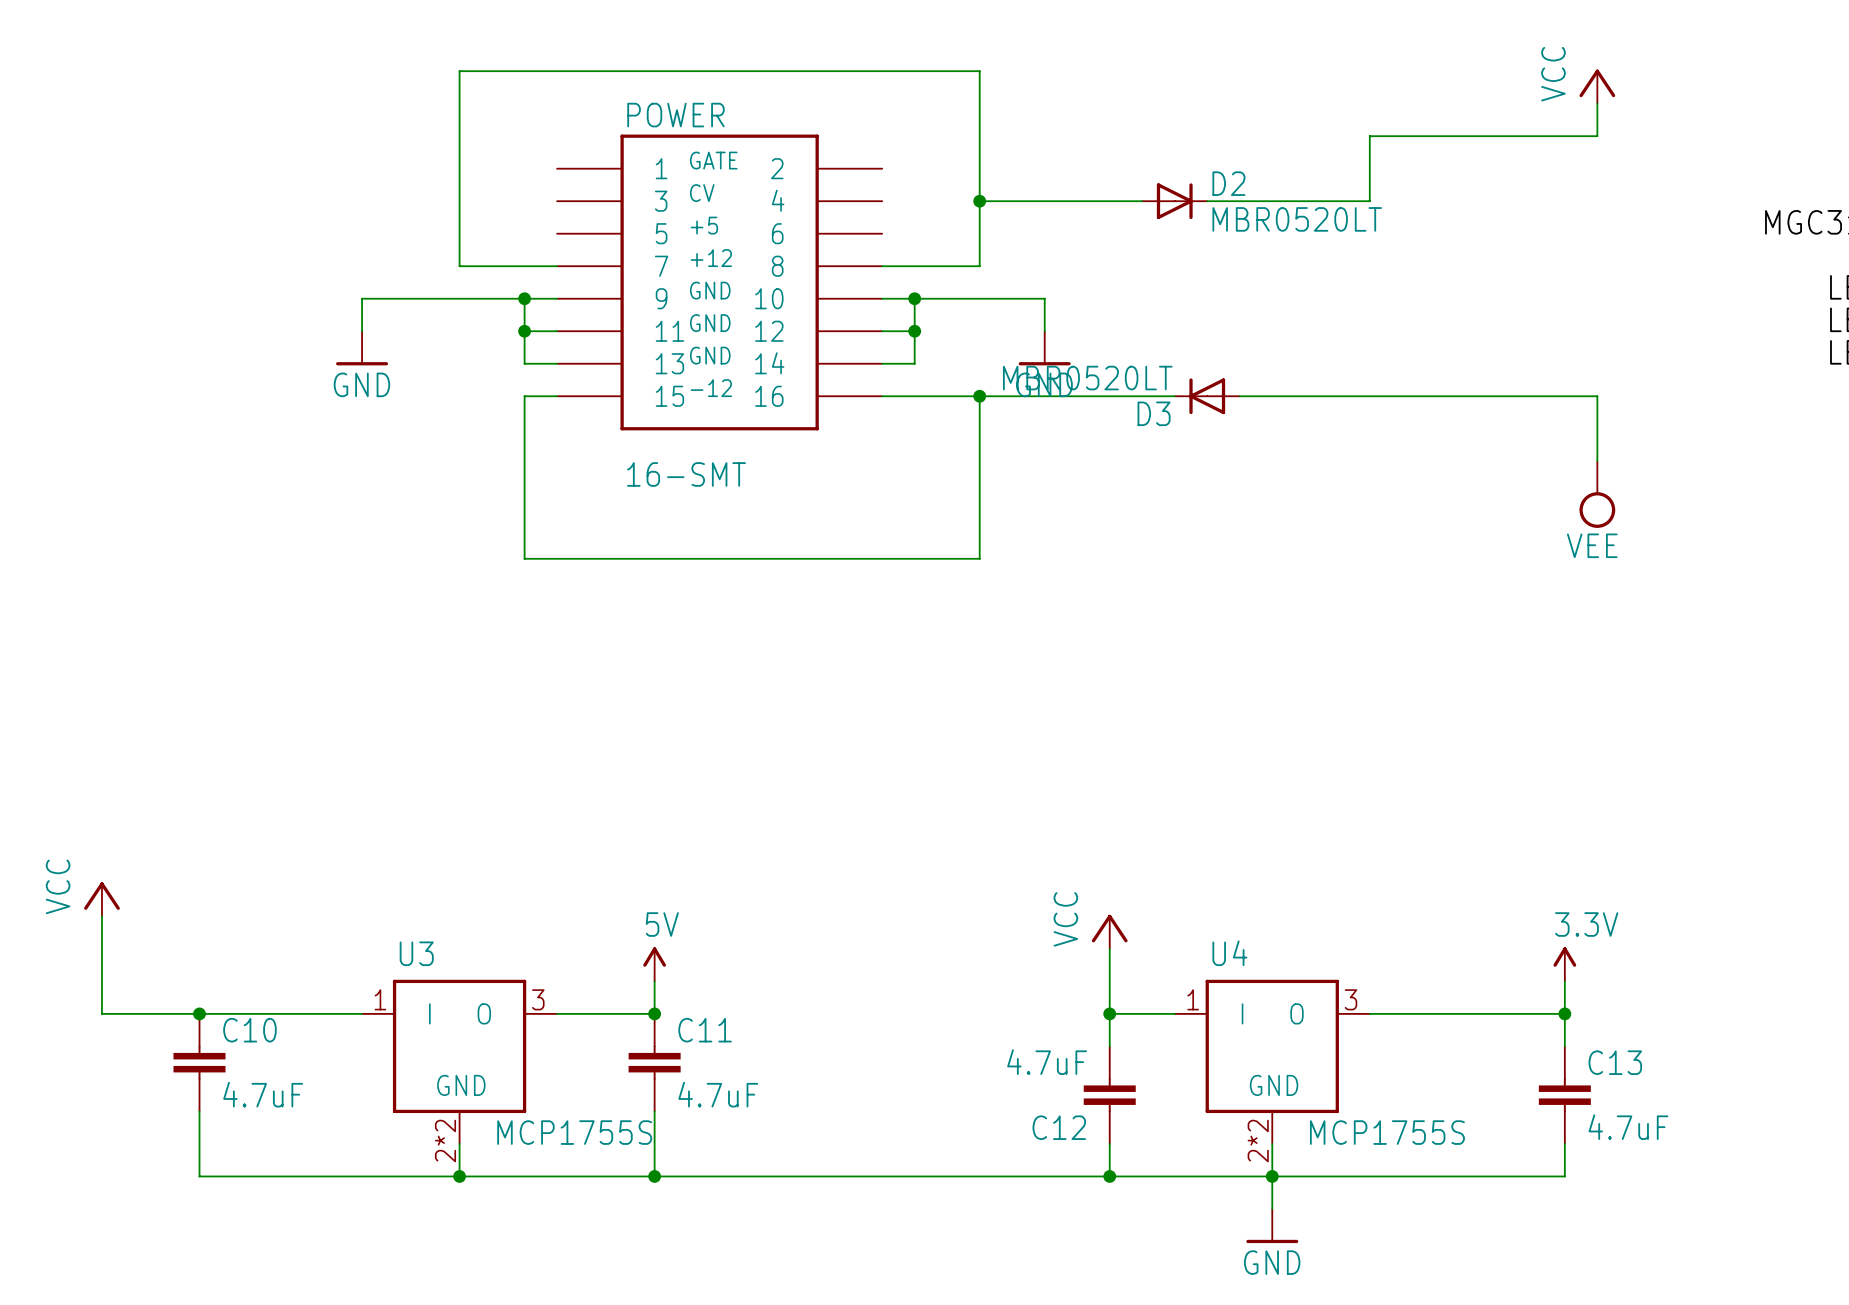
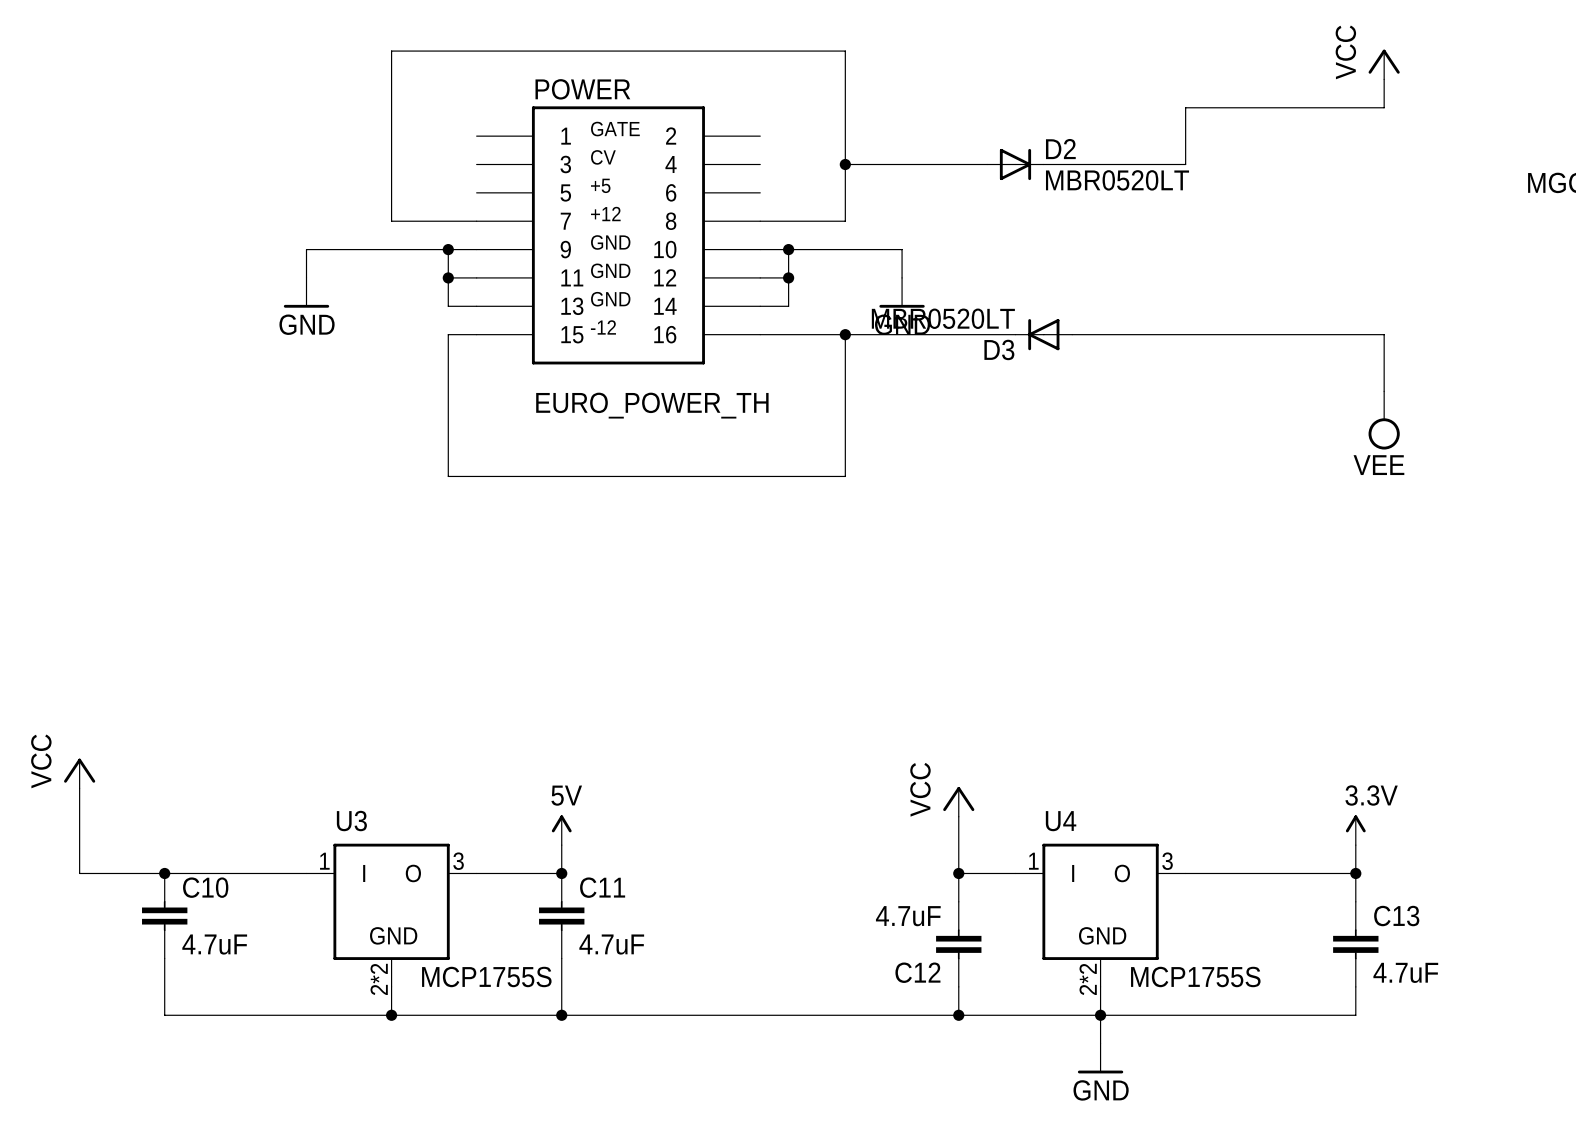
POWER value: 16-SMT (686, 474) -> EURO_POWER_TH (652, 405)

